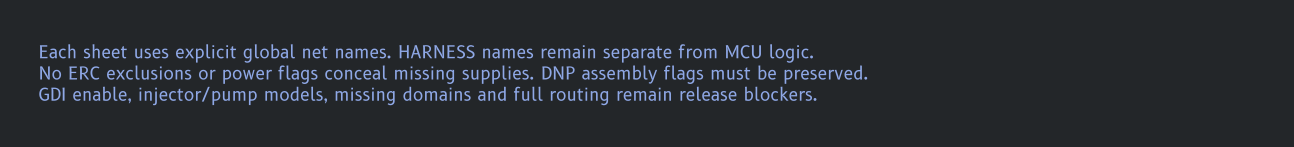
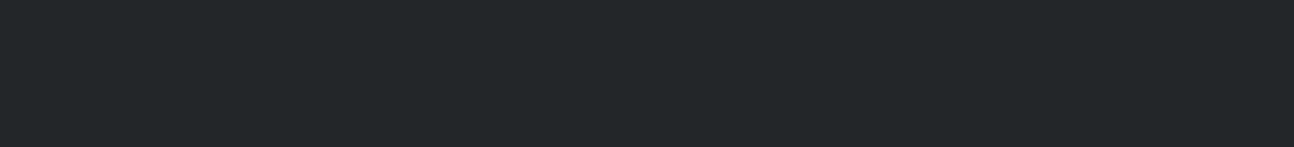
text: Each sheet uses explicit global net names. HARNESS names remain separate from MCU logic. (426, 53) -> none
text: No ERC exclusions or power flags conceal missing supplies. DNP assembly flags must be preserved. (453, 74) -> none
text: GDI enable, injector/pump models, missing domains and full routing remain release blockers. (427, 95) -> none

